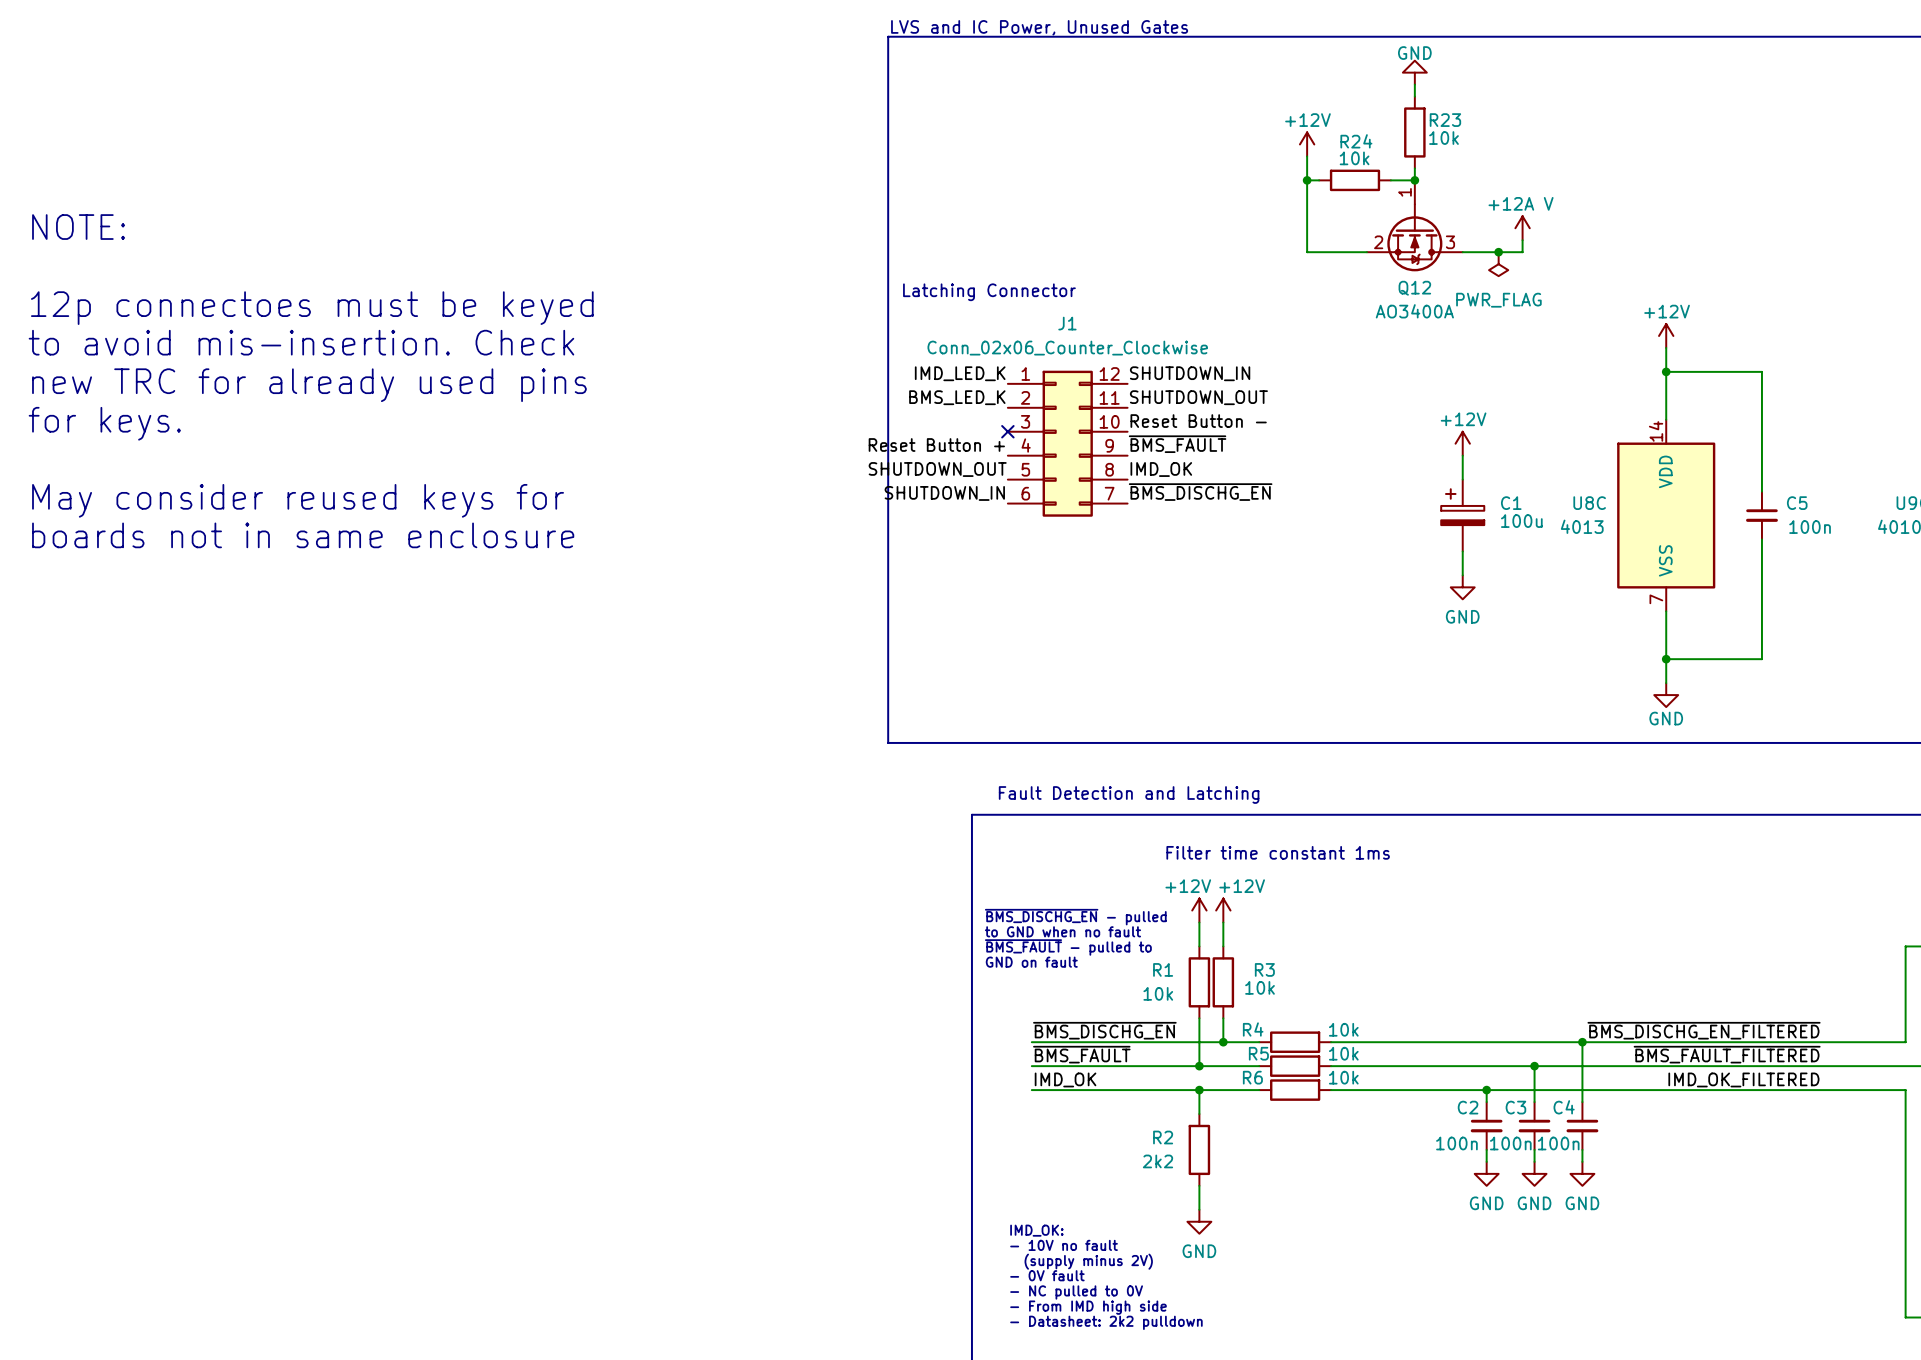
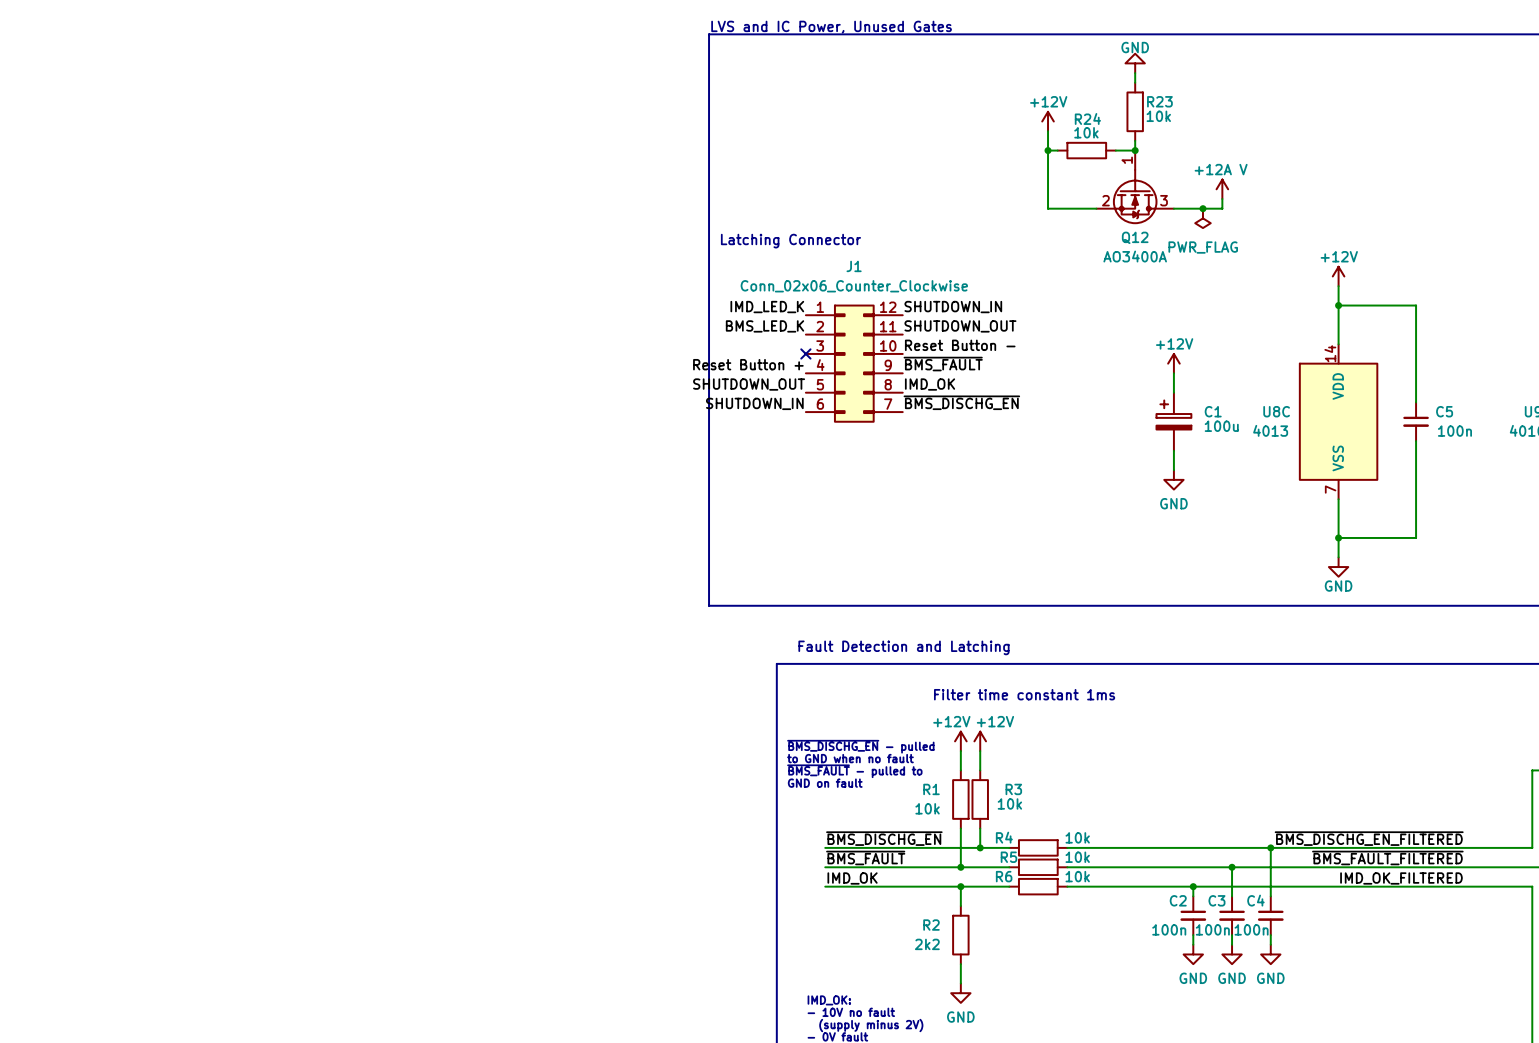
text: NOTE: (78, 227) -> none
text: 12p connectoes must be keyed (312, 308) -> none
text: to avoid mis-insertion. Check (301, 342) -> none
text: new TRC for already used pins (309, 385) -> none
text: for keys. (104, 423) -> none
text: May consider reused keys for (298, 500) -> none
text: boards not in same enclosure (303, 535) -> none

